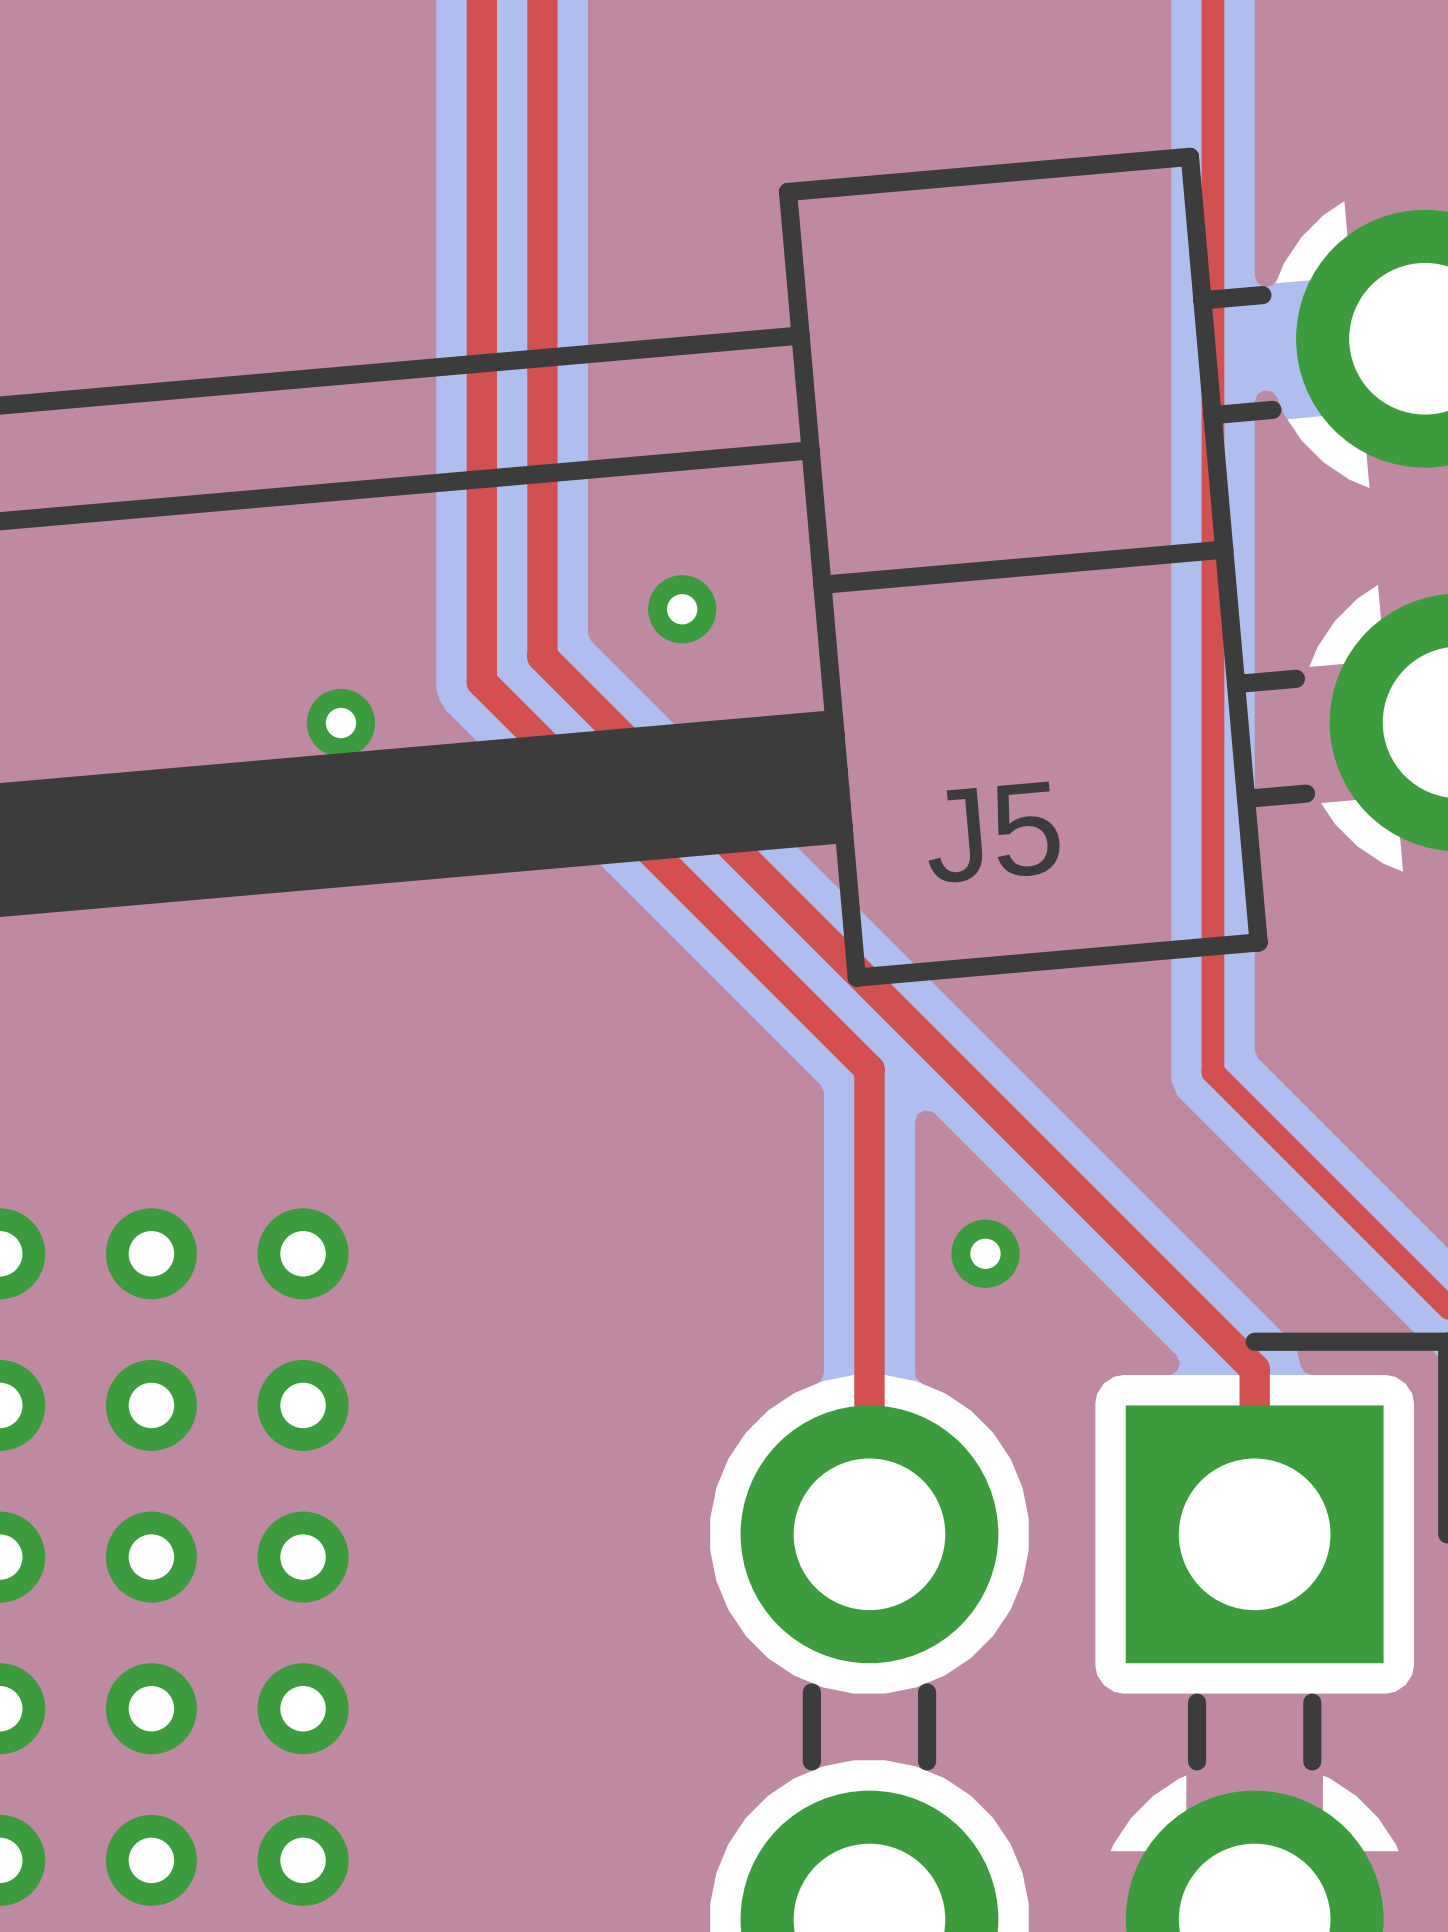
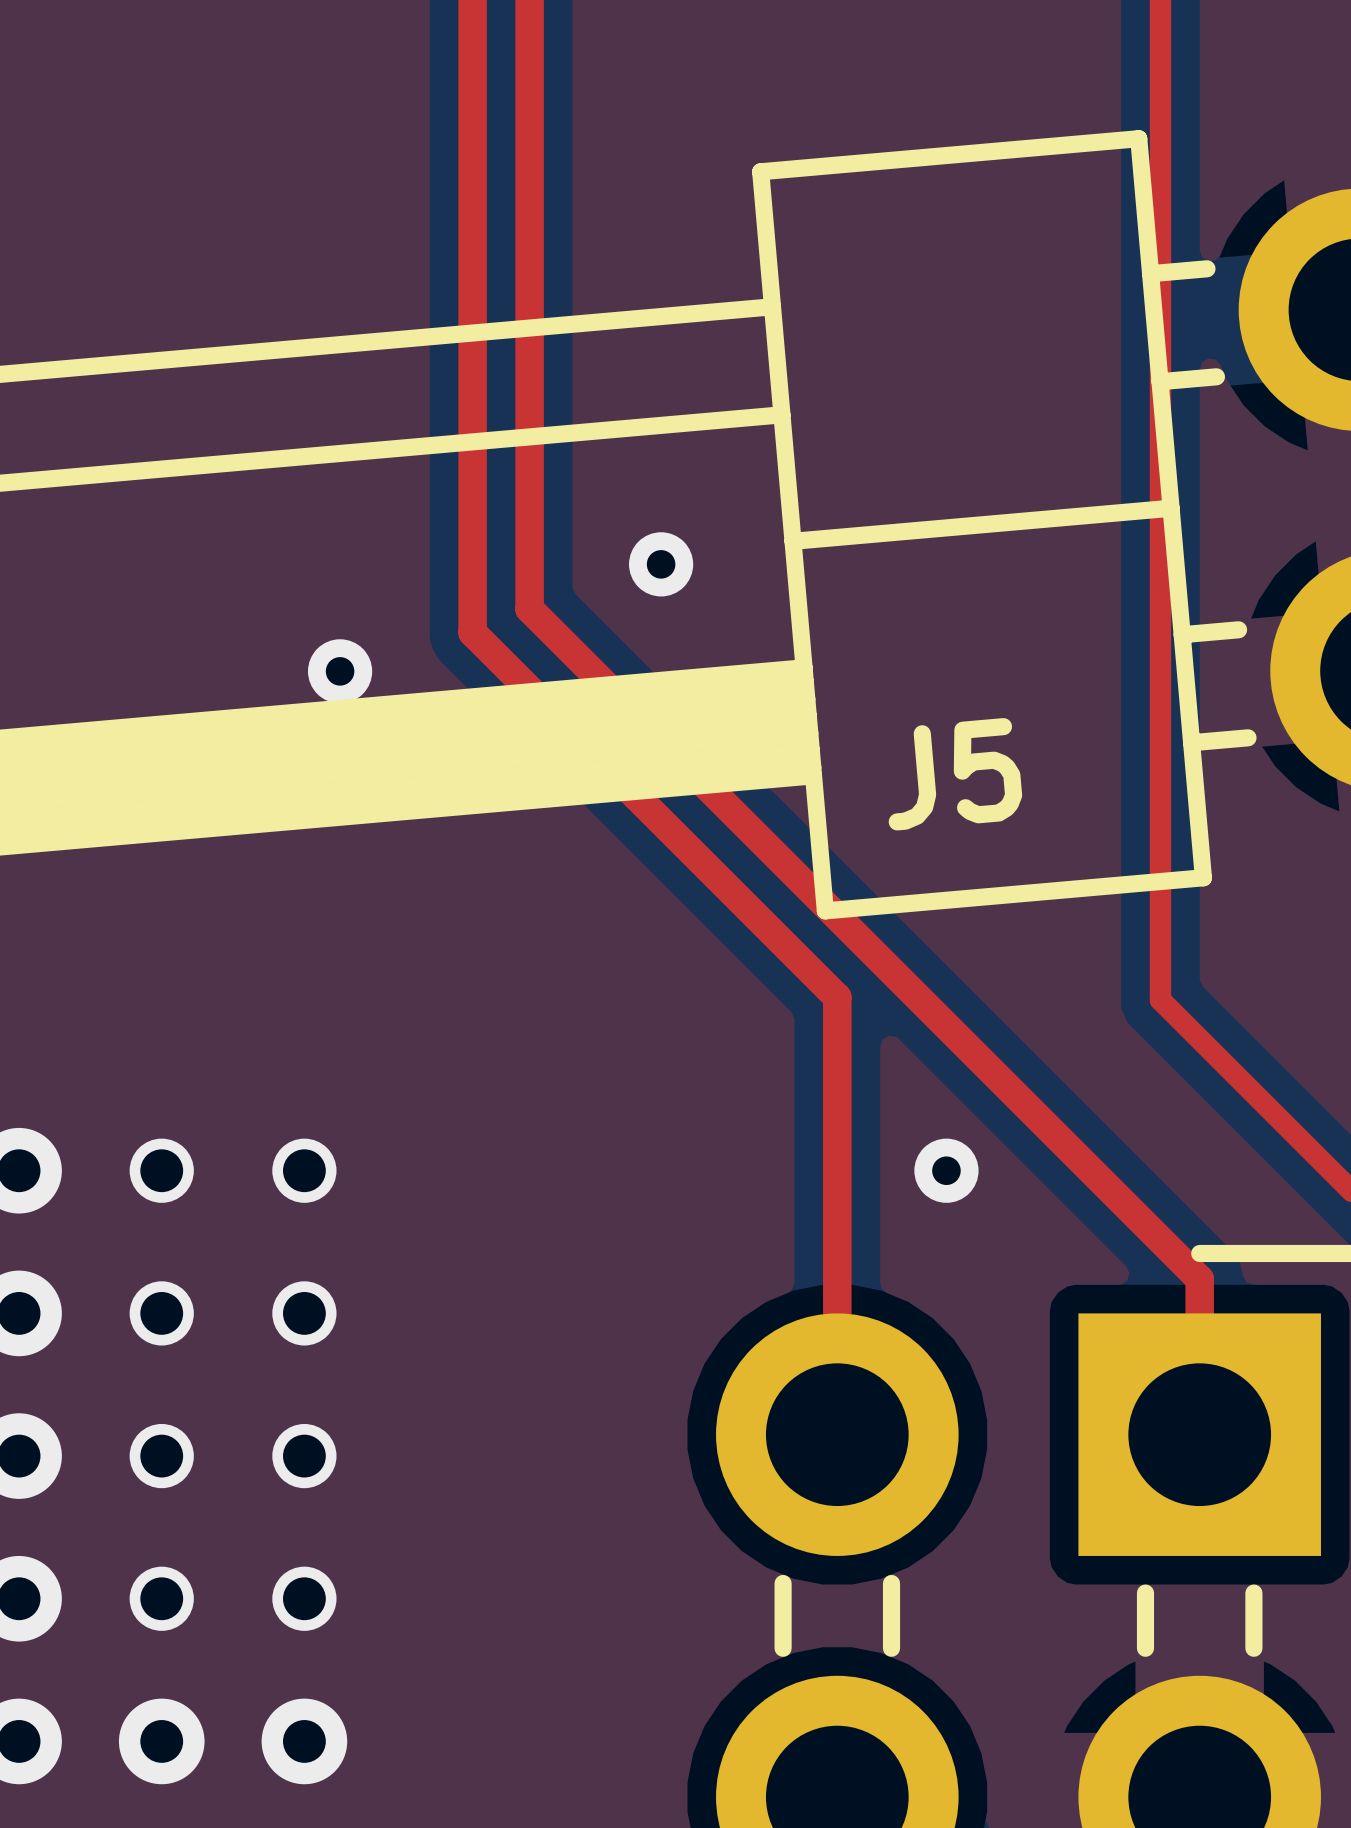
via size: [105, 1208, 197, 1300] -> [129, 1138, 194, 1203]
via size: [257, 1208, 349, 1300] -> [272, 1138, 337, 1203]
via size: [105, 1359, 197, 1451] -> [129, 1281, 194, 1346]
via size: [257, 1359, 349, 1451] -> [272, 1281, 337, 1346]
via size: [105, 1511, 197, 1603] -> [129, 1423, 194, 1489]
via size: [257, 1511, 349, 1603] -> [272, 1423, 337, 1489]
via size: [105, 1663, 197, 1755] -> [129, 1566, 194, 1631]
via size: [257, 1663, 349, 1755] -> [272, 1566, 337, 1631]

